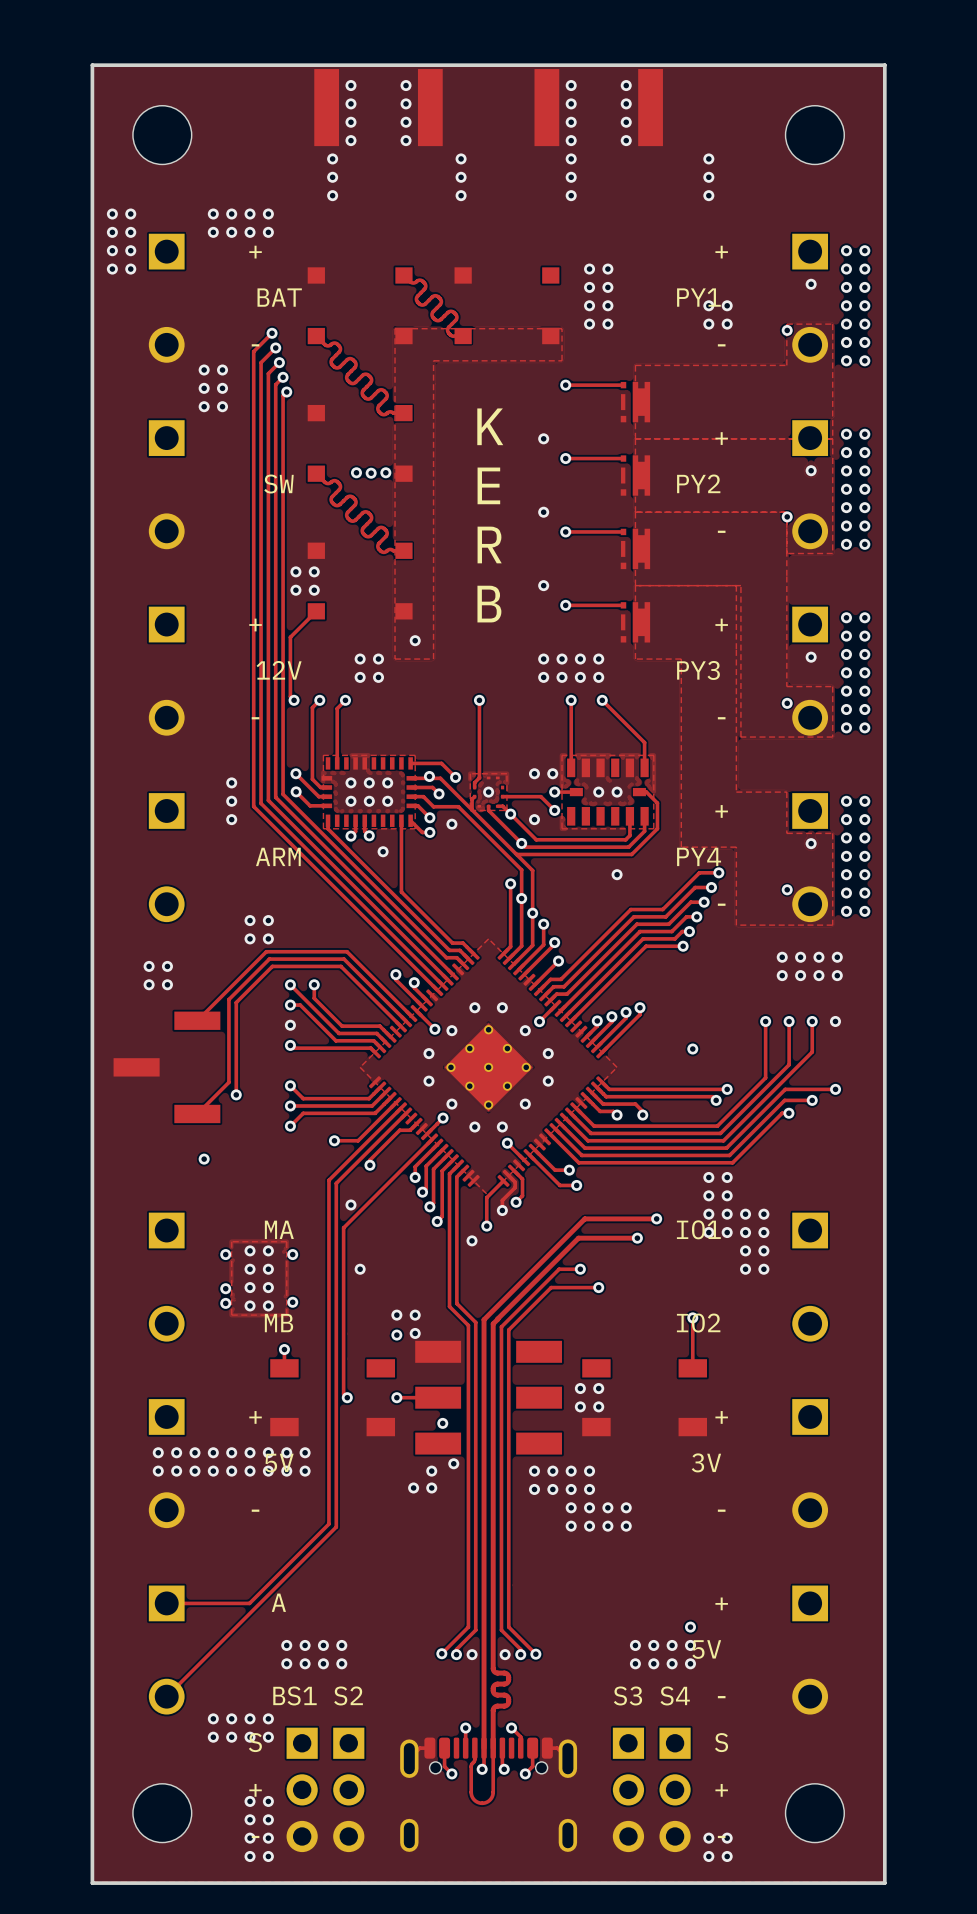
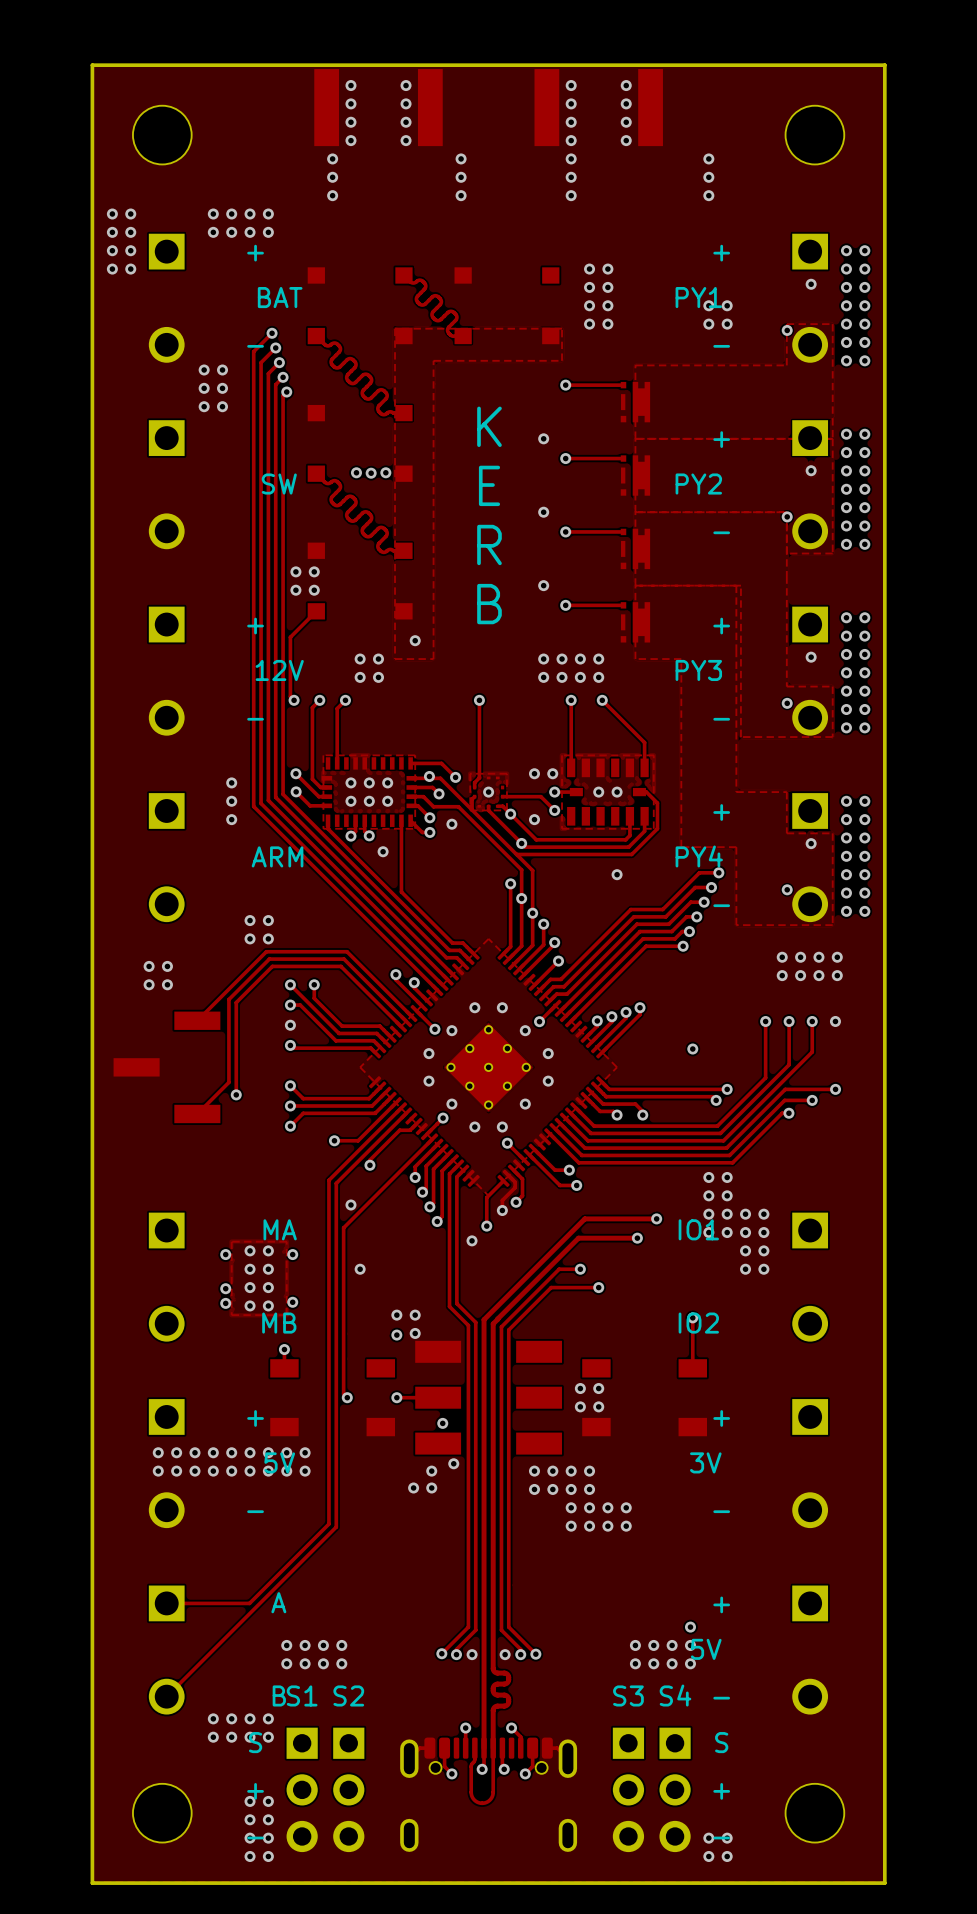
via: (204, 1159) -> none

